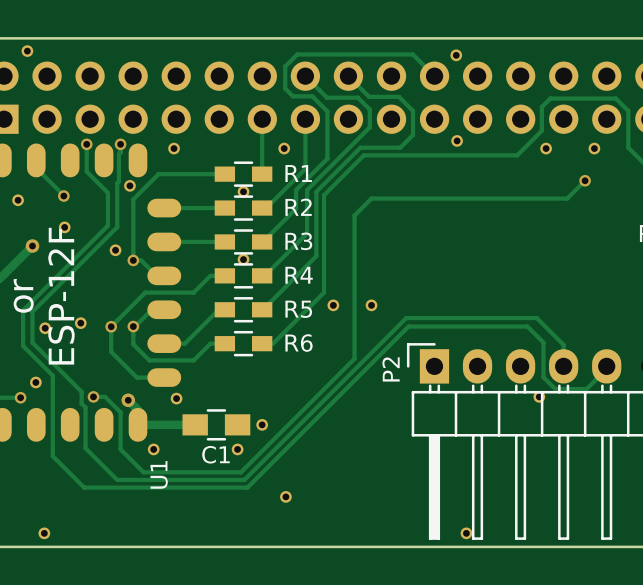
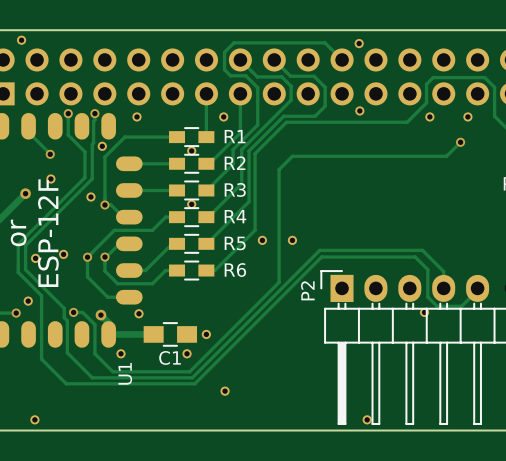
part: (18, 200) -> none

